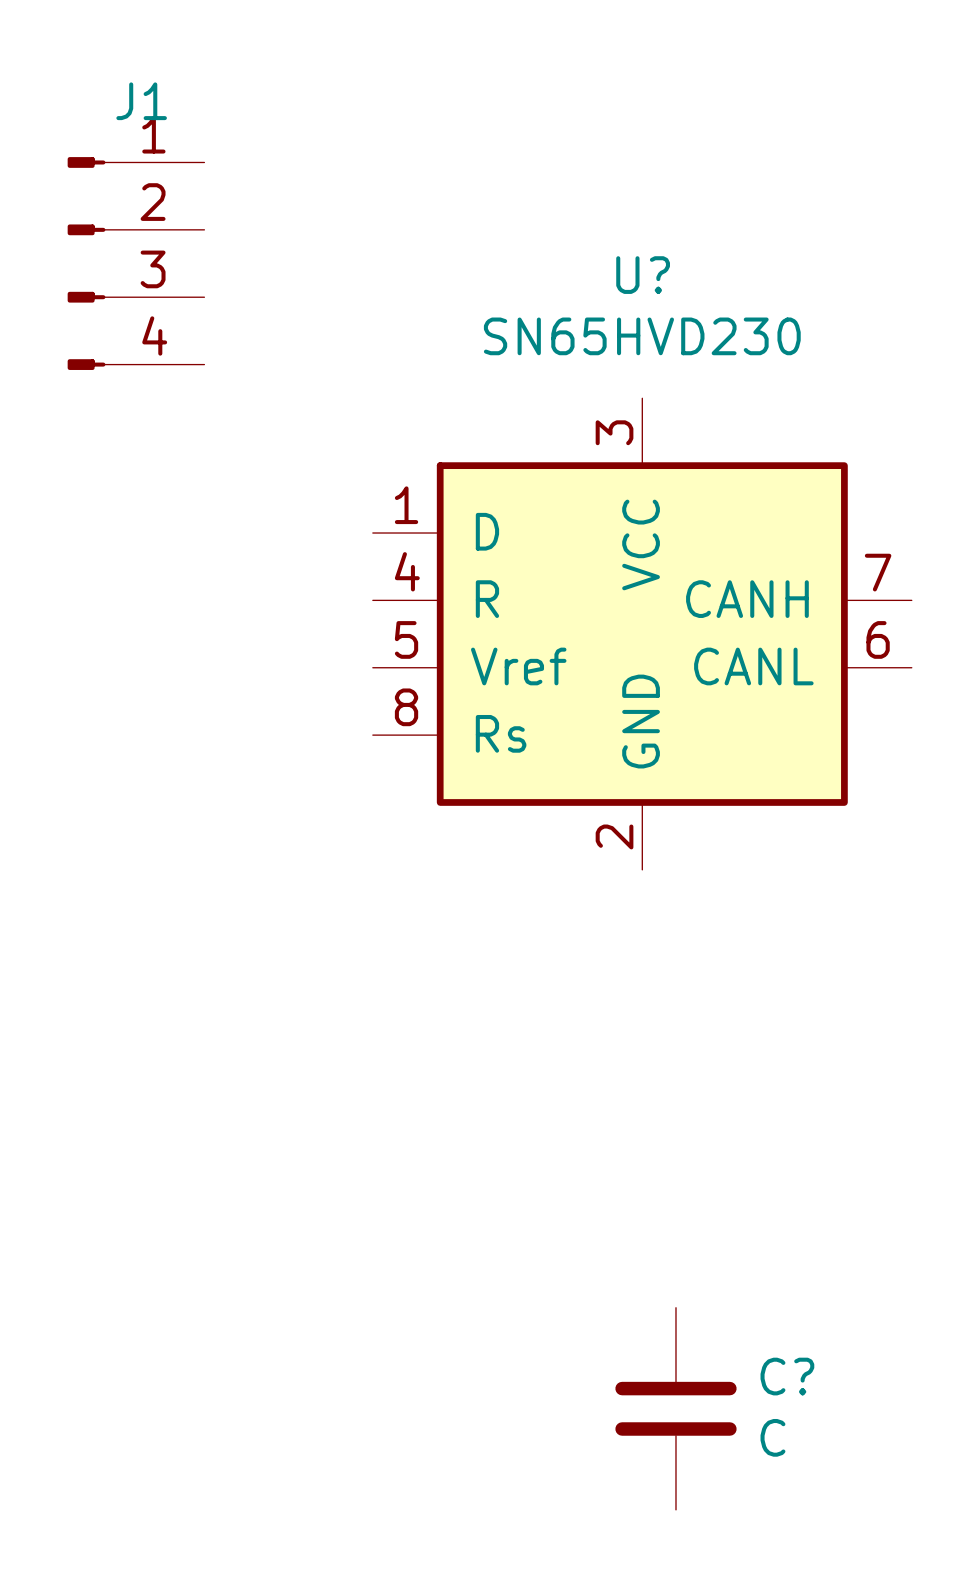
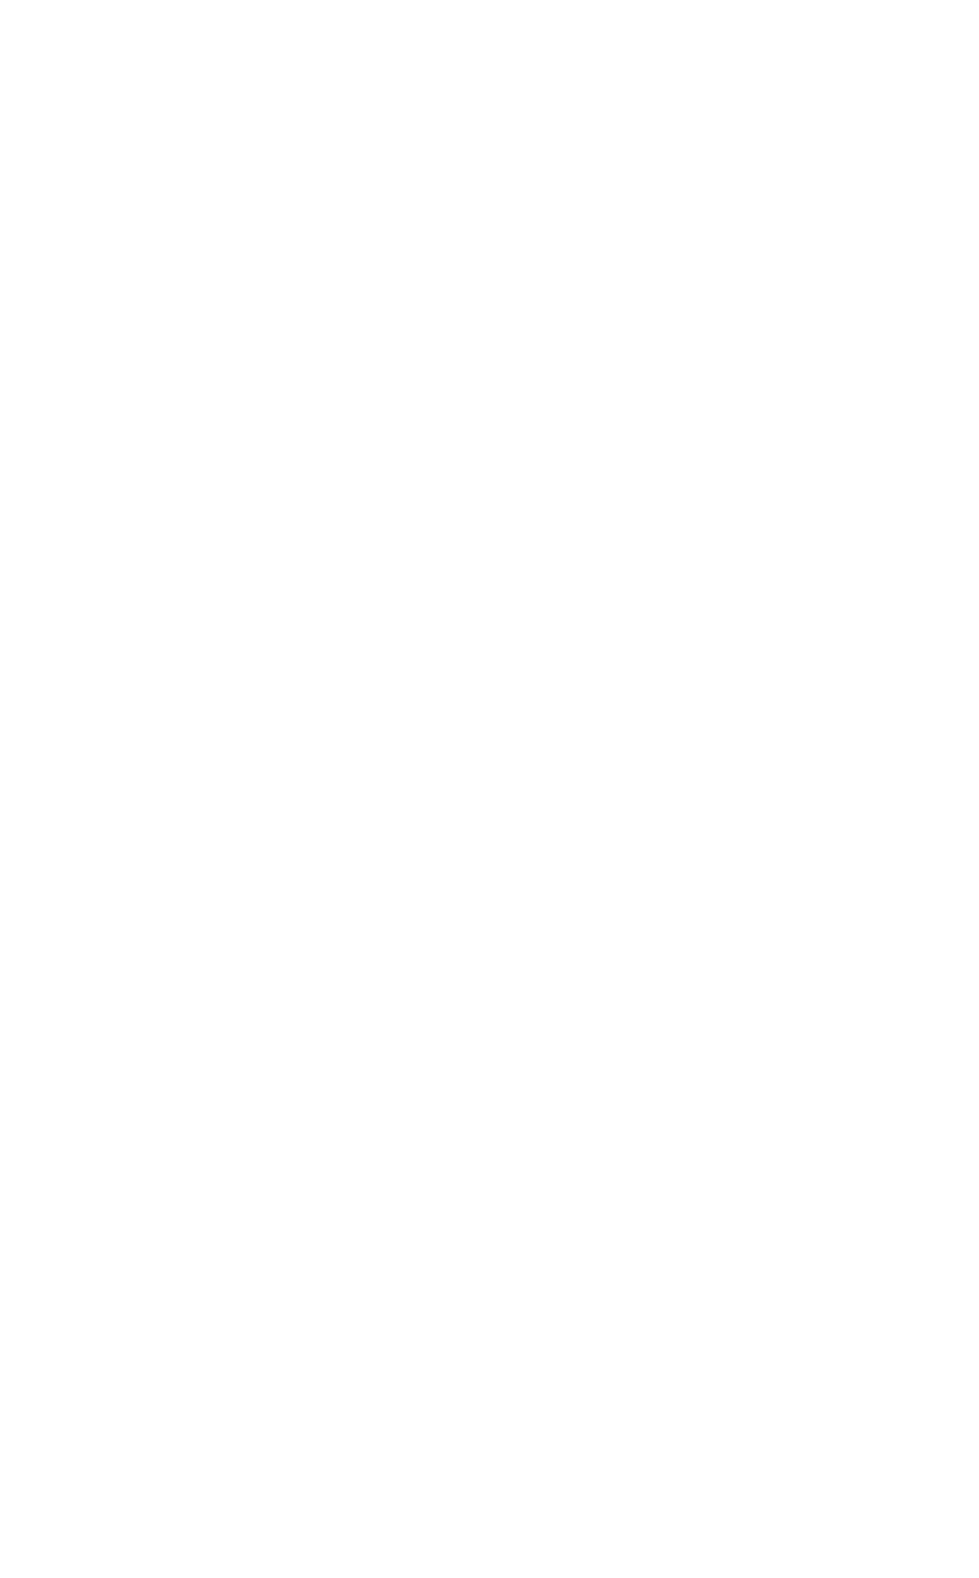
J1: (136, 263) -> none
U?: SN65HVD230 (642, 634) -> none
C?: C (675, 1408) -> none

